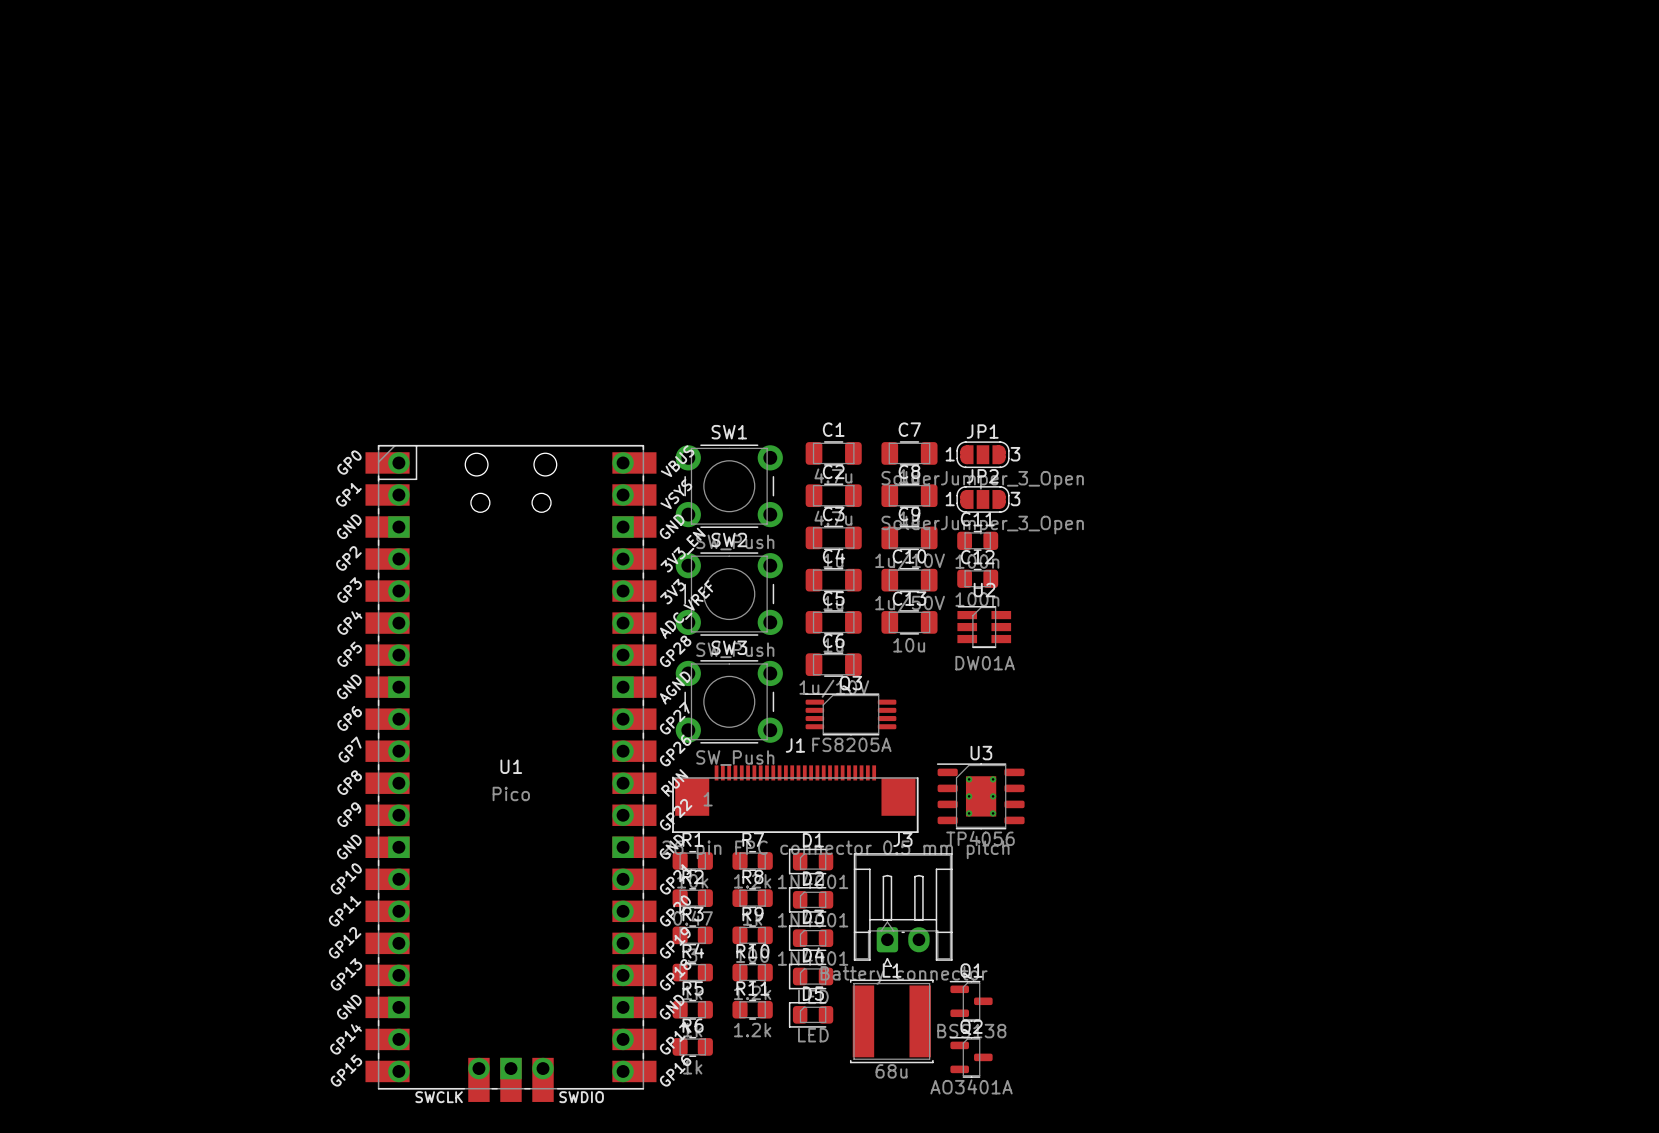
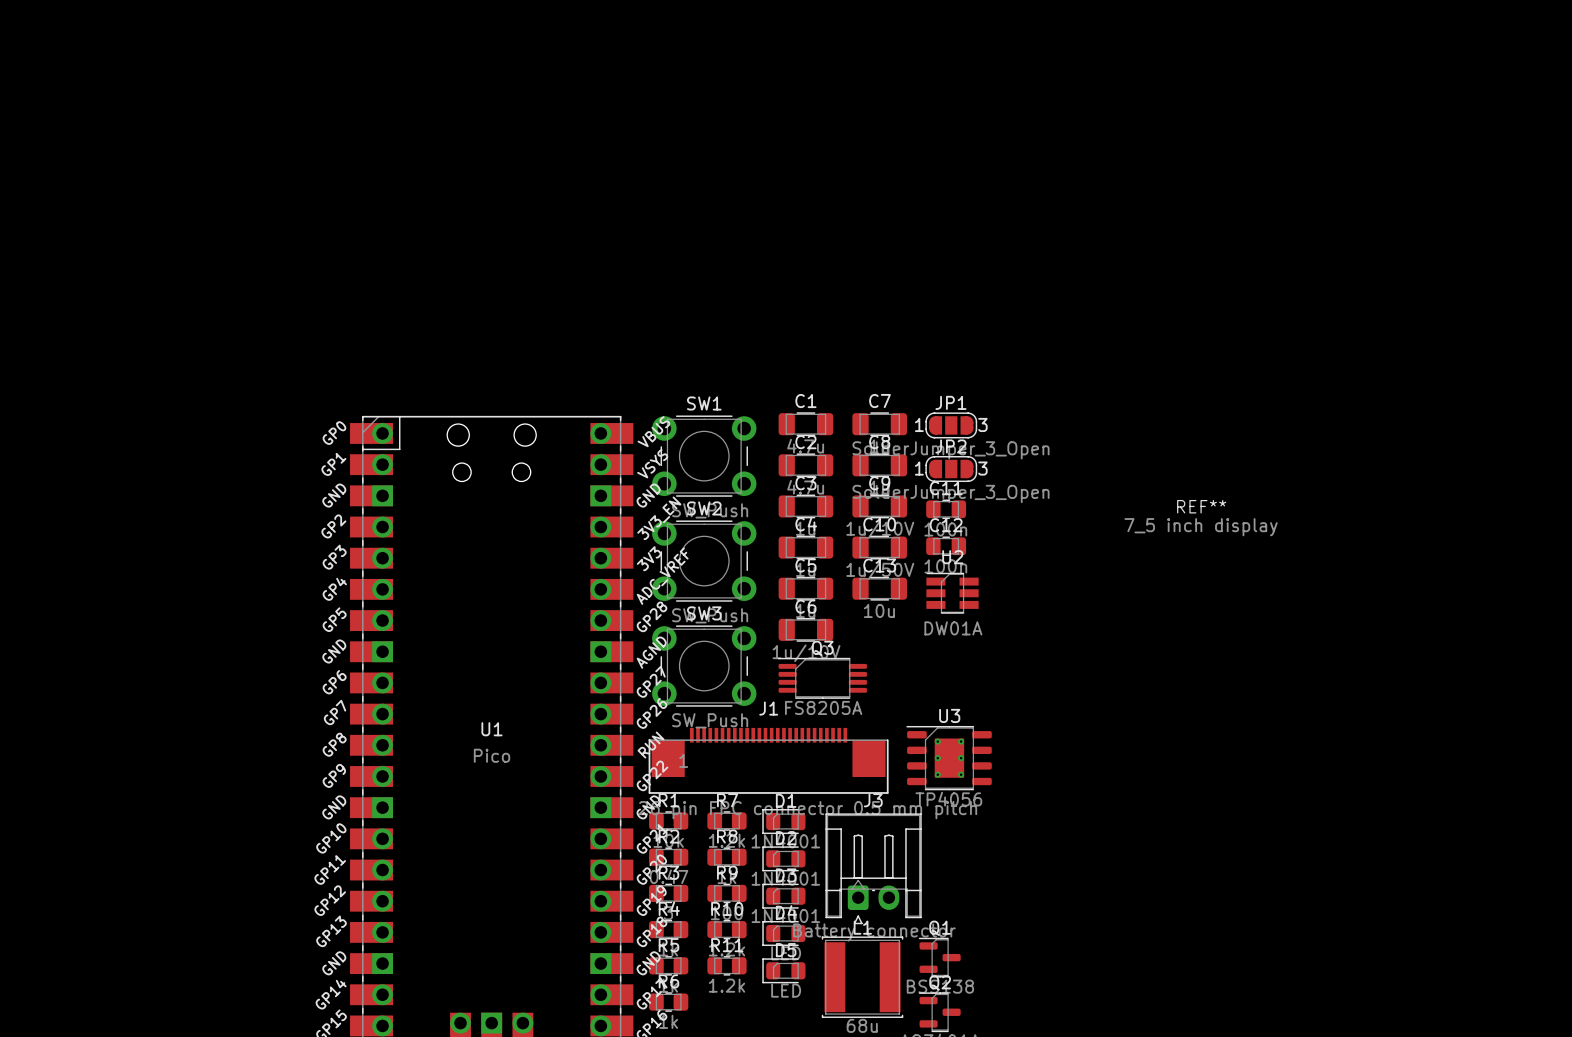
REF**: none -> 7_5 inch display (1201, 518)

